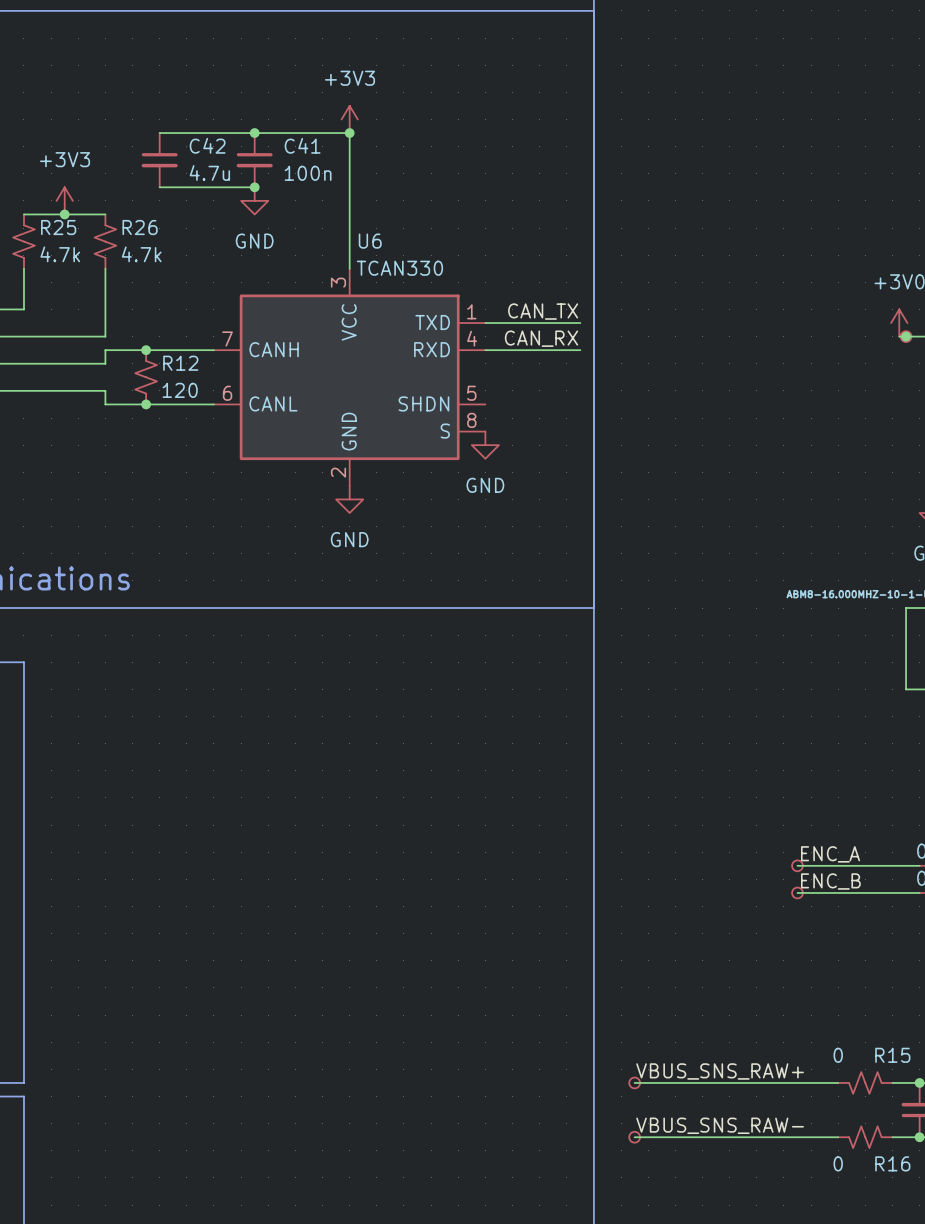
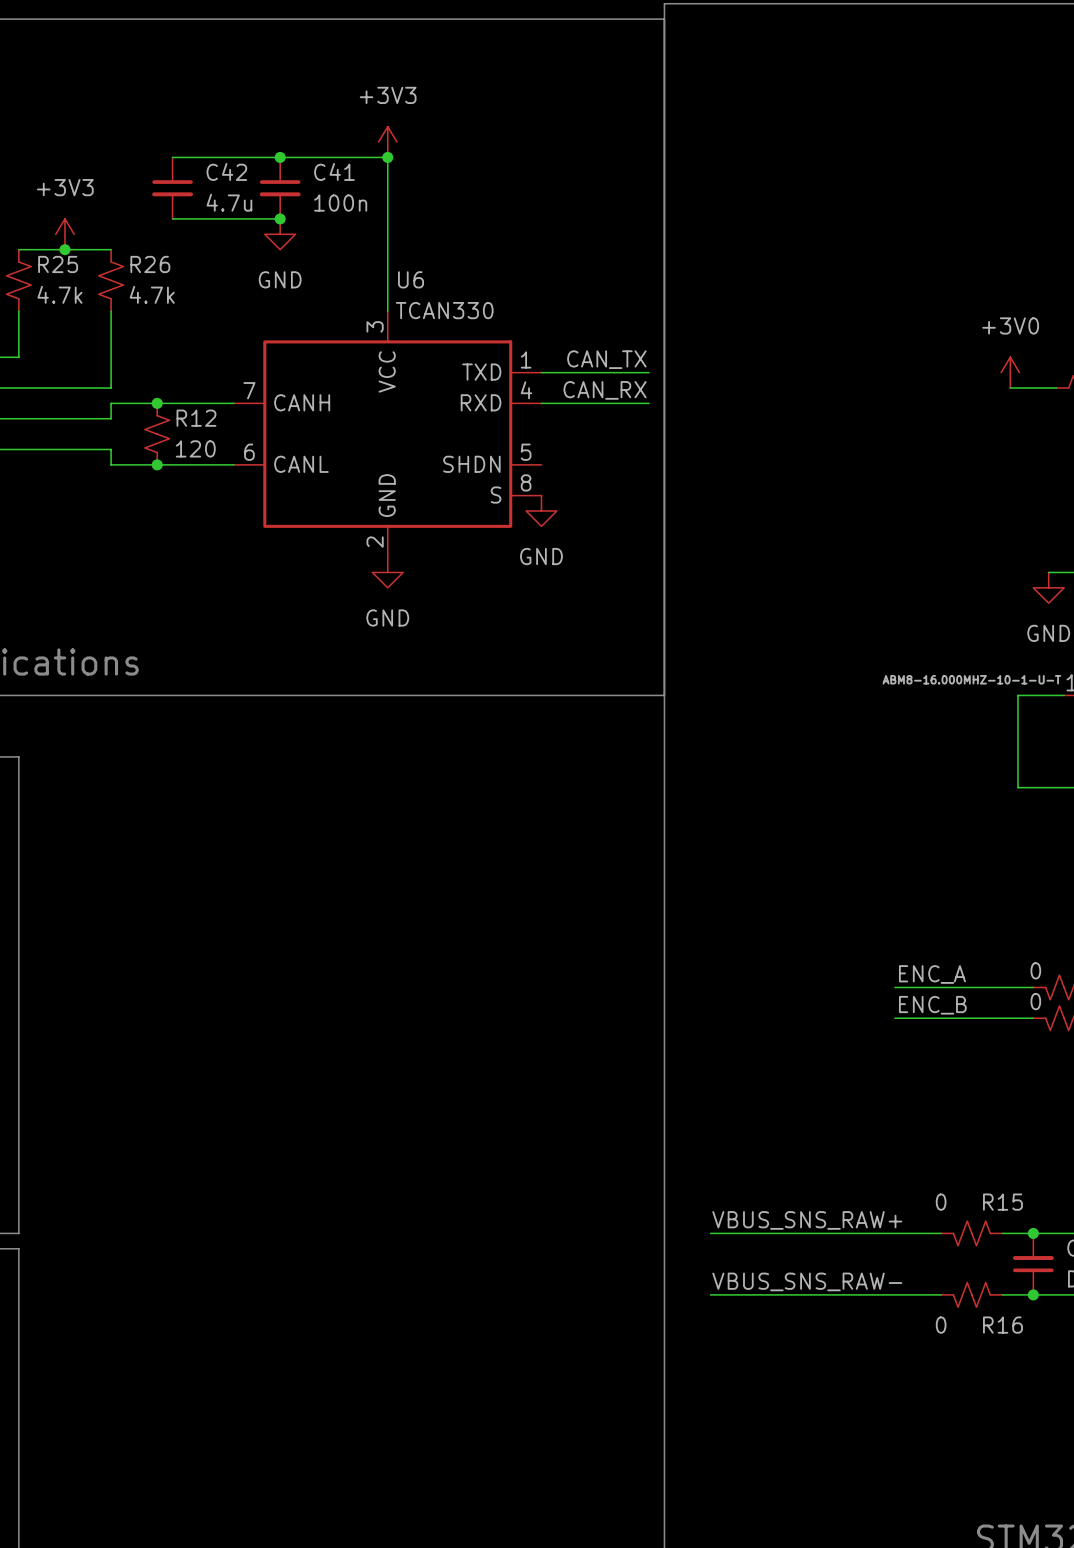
junction: (906, 336) -> none
part: (906, 336) -> none
part: (797, 865) -> none
part: (797, 892) -> none
part: (634, 1082) -> none
part: (634, 1137) -> none

